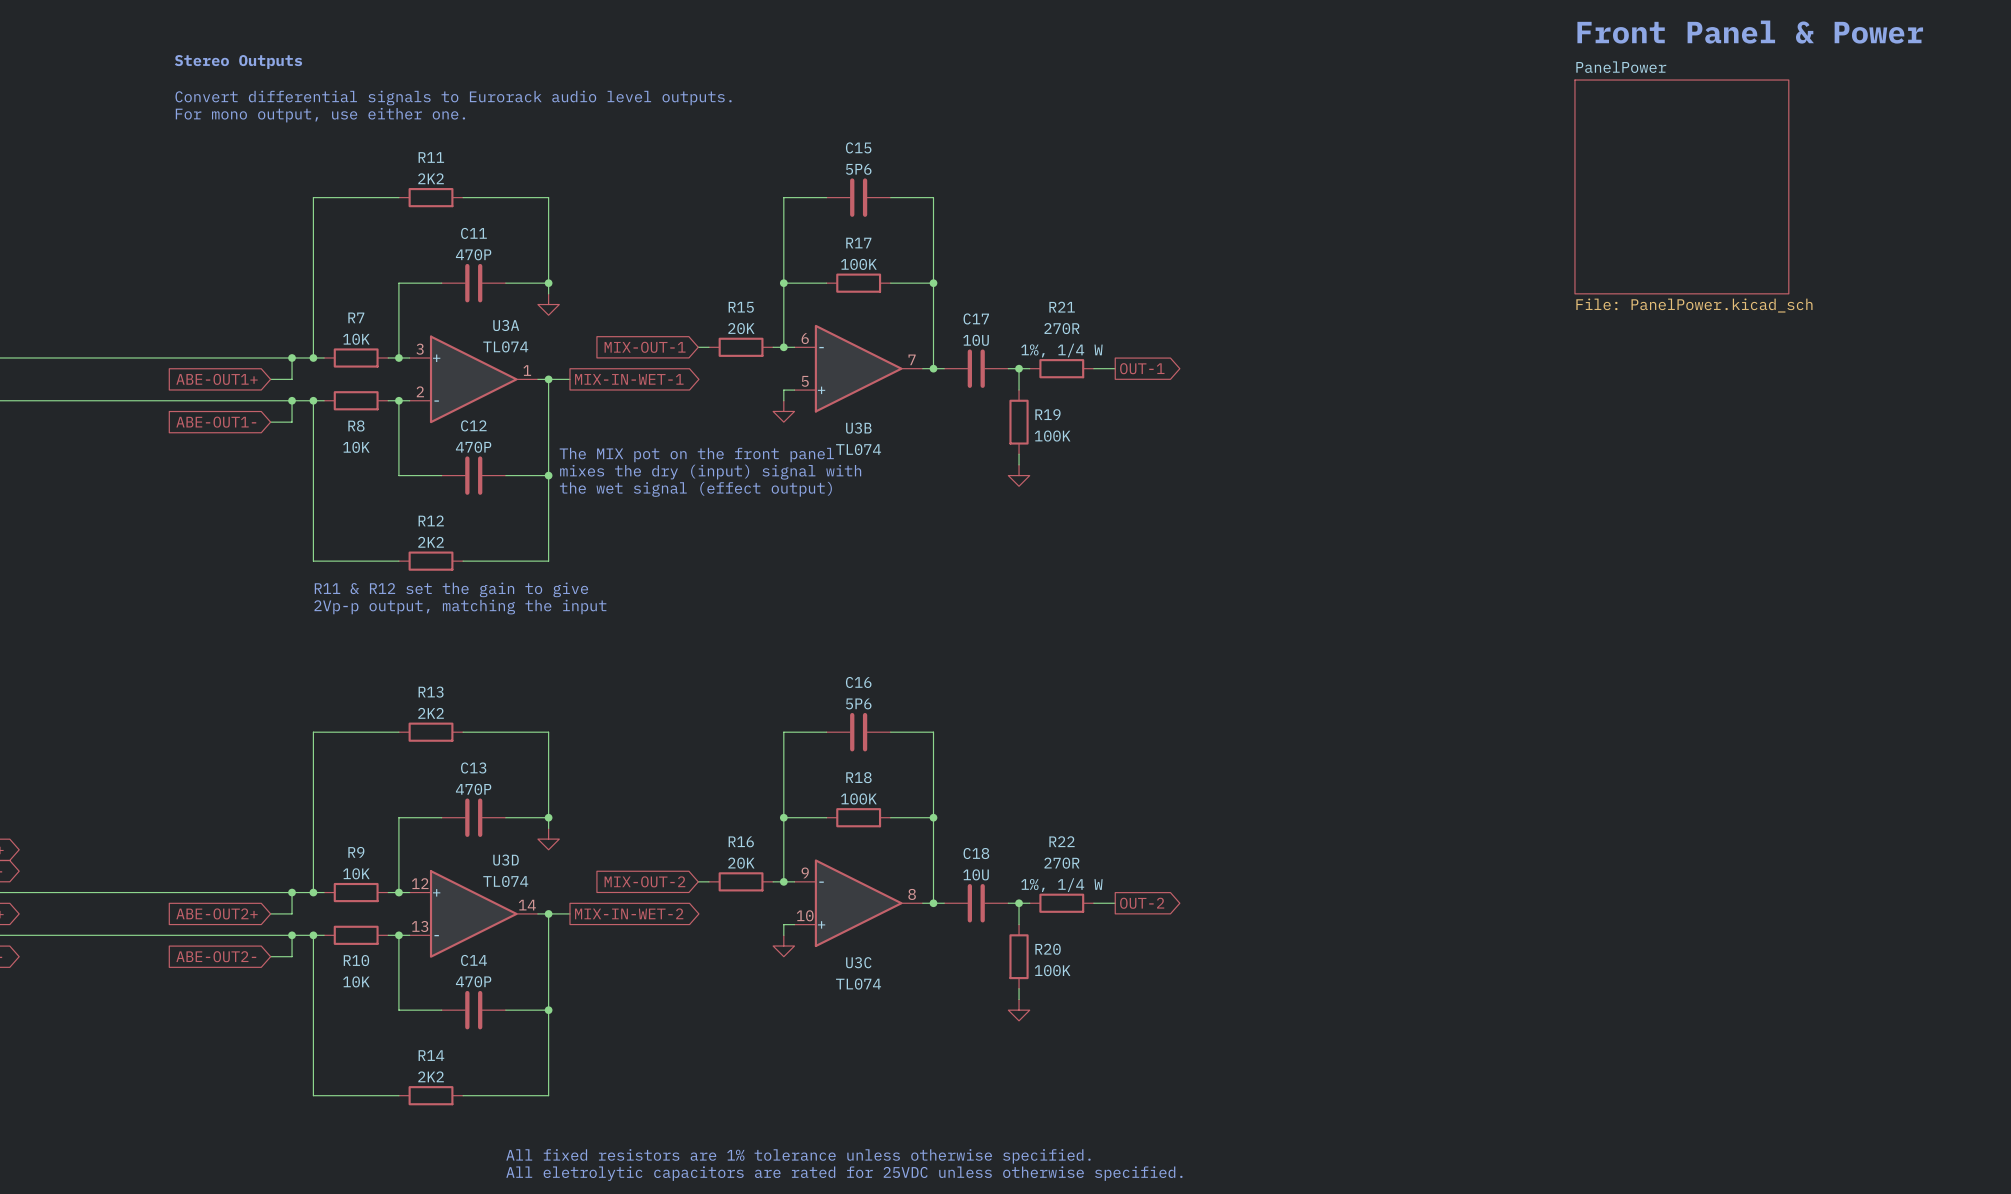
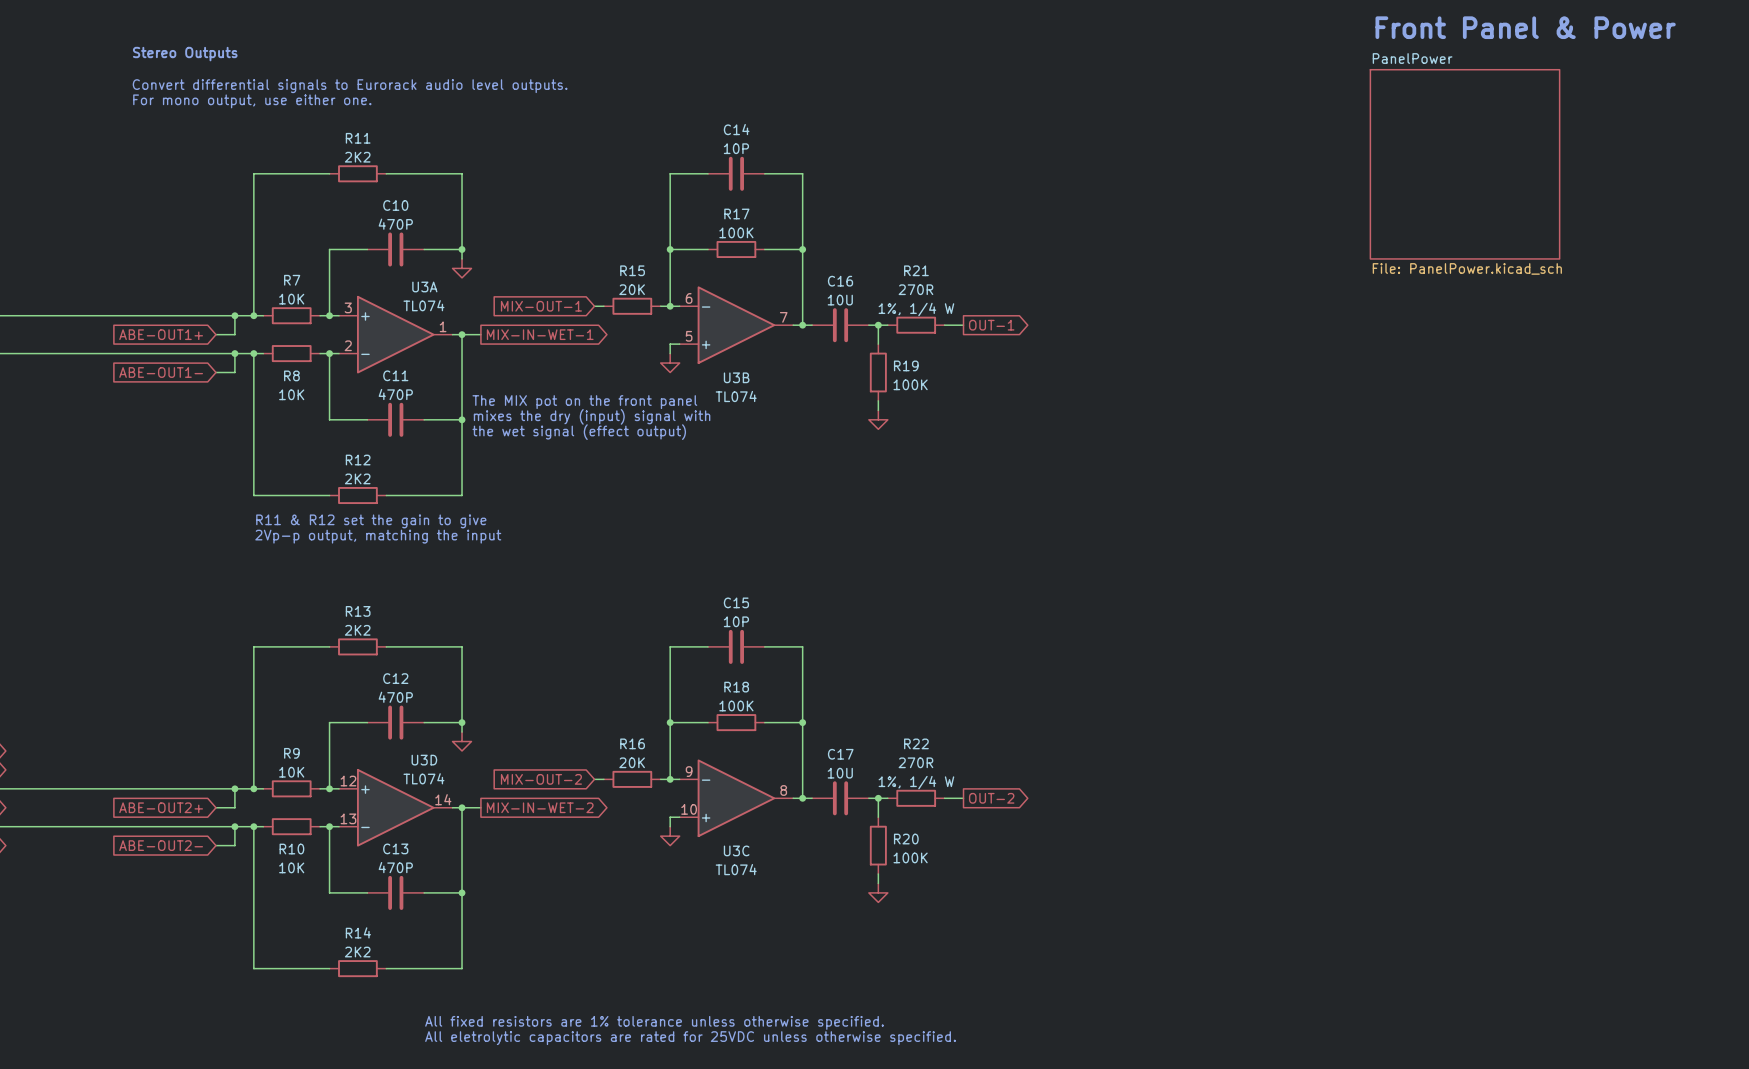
C15 name: C15 (858, 147) -> C14 (736, 129)
C15 value: 5P6 (858, 169) -> 10P (736, 148)
C11 name: C11 (473, 233) -> C10 (395, 205)
C17 name: C17 (976, 318) -> C16 (840, 281)
C12 name: C12 (473, 425) -> C11 (395, 375)
C16 name: C16 (858, 682) -> C15 (736, 602)
C16 value: 5P6 (858, 703) -> 10P (736, 621)
C13 name: C13 (473, 767) -> C12 (395, 678)
C18 name: C18 (976, 853) -> C17 (840, 754)
C14 name: C14 (474, 960) -> C13 (395, 848)

